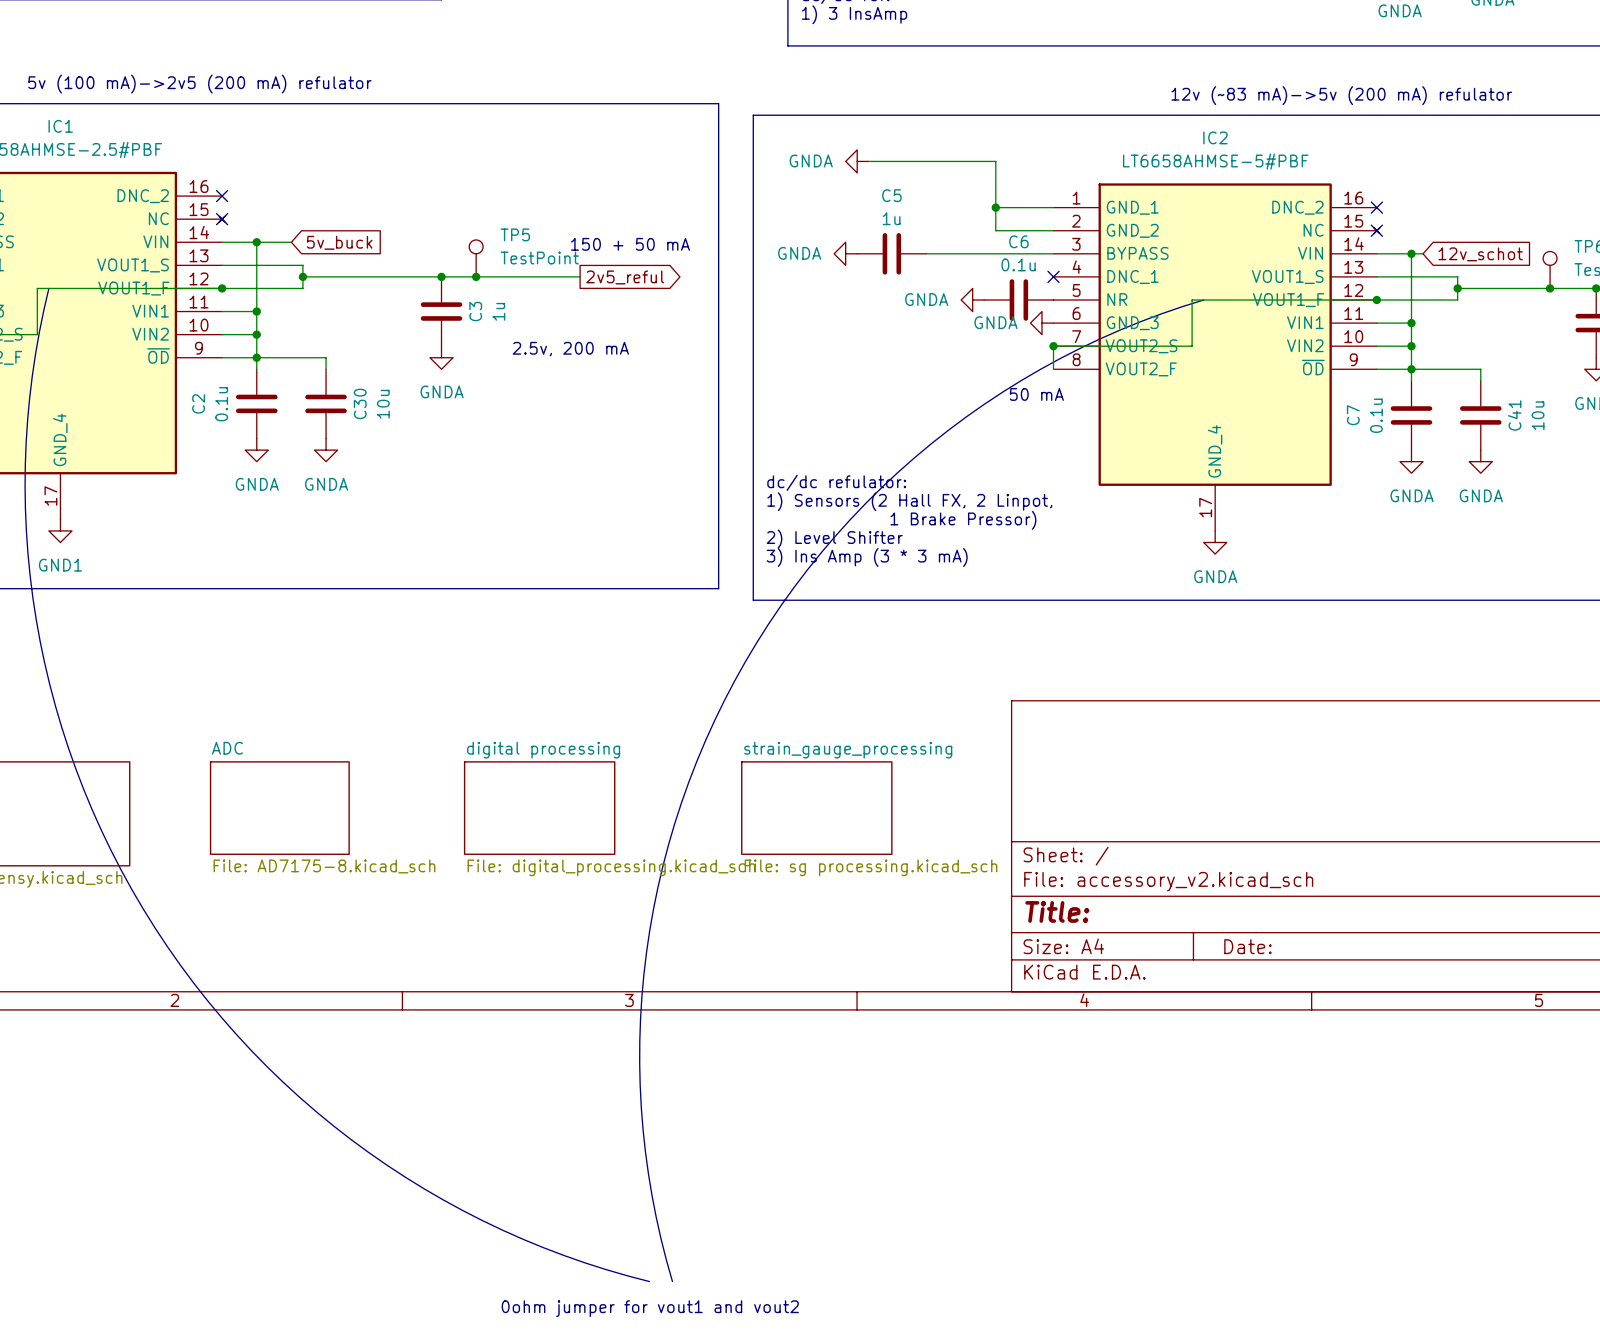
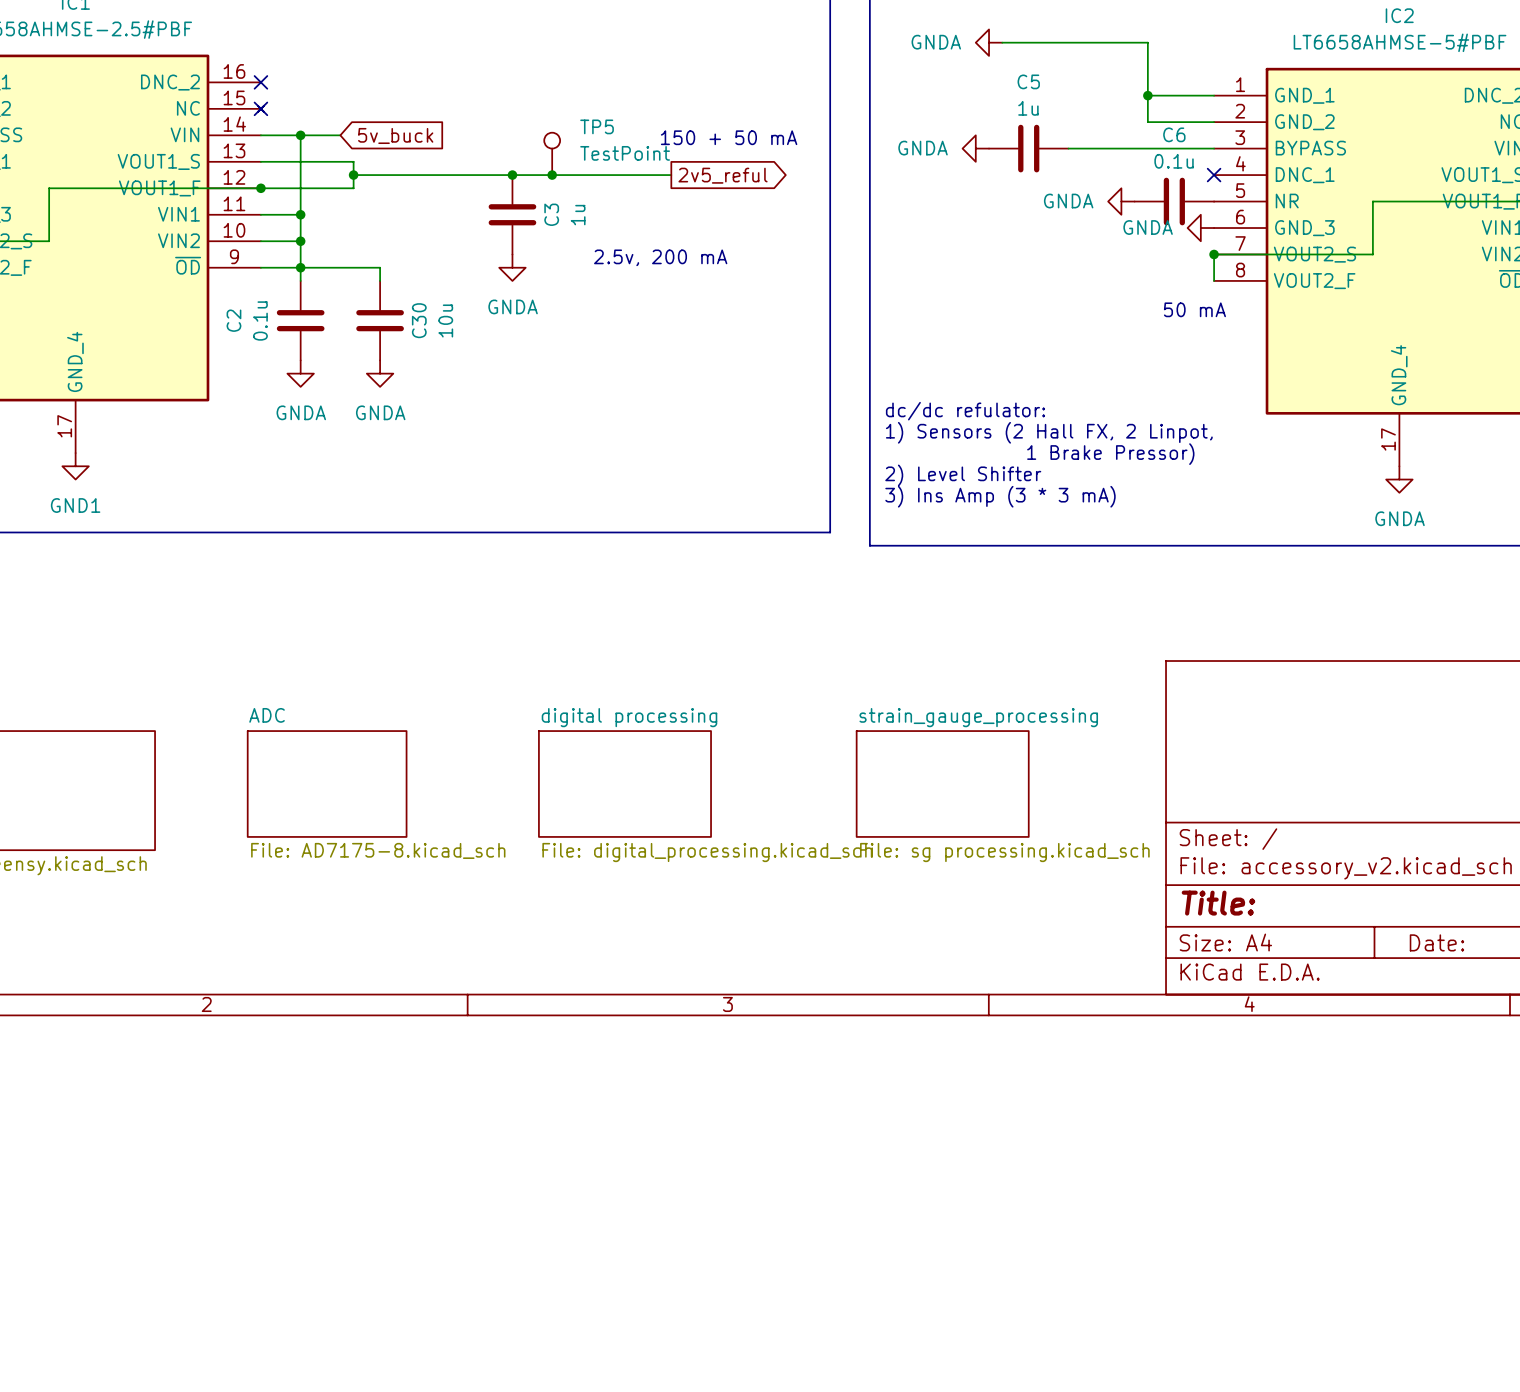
line: (48, 288) (35, 353) (26, 442) (26, 530) (36, 619) (55, 706) (76, 769) (111, 850) (143, 909) (193, 982) (236, 1034) (282, 1081) (350, 1139) (424, 1188) (502, 1230) (564, 1255) (649, 1281) -> none
line: (1203, 299) (1140, 321) (1060, 358) (984, 404) (931, 443) (881, 487) (821, 552) (781, 605) (734, 680) (697, 760) (674, 823) (653, 909) (643, 974) (639, 1041) (643, 1129) (656, 1217) (672, 1281) -> none
text: 0ohm jumper for vout1 and vout2 (650, 1308) -> none

